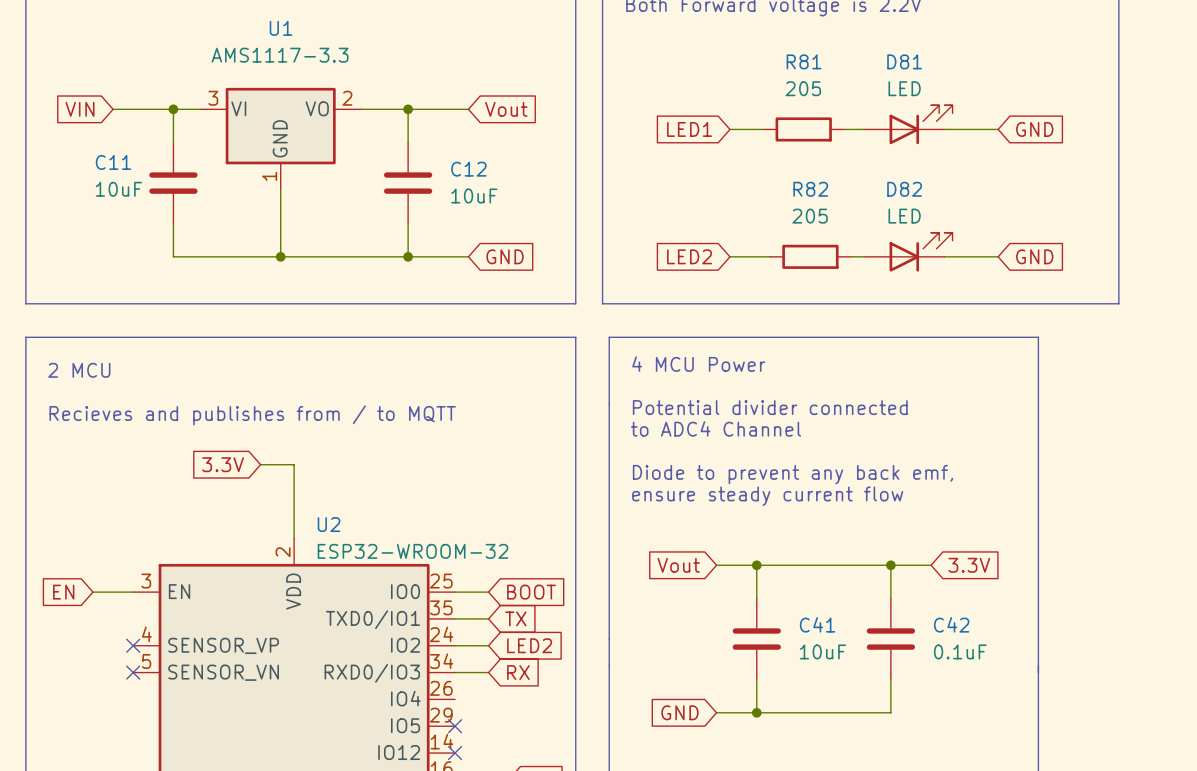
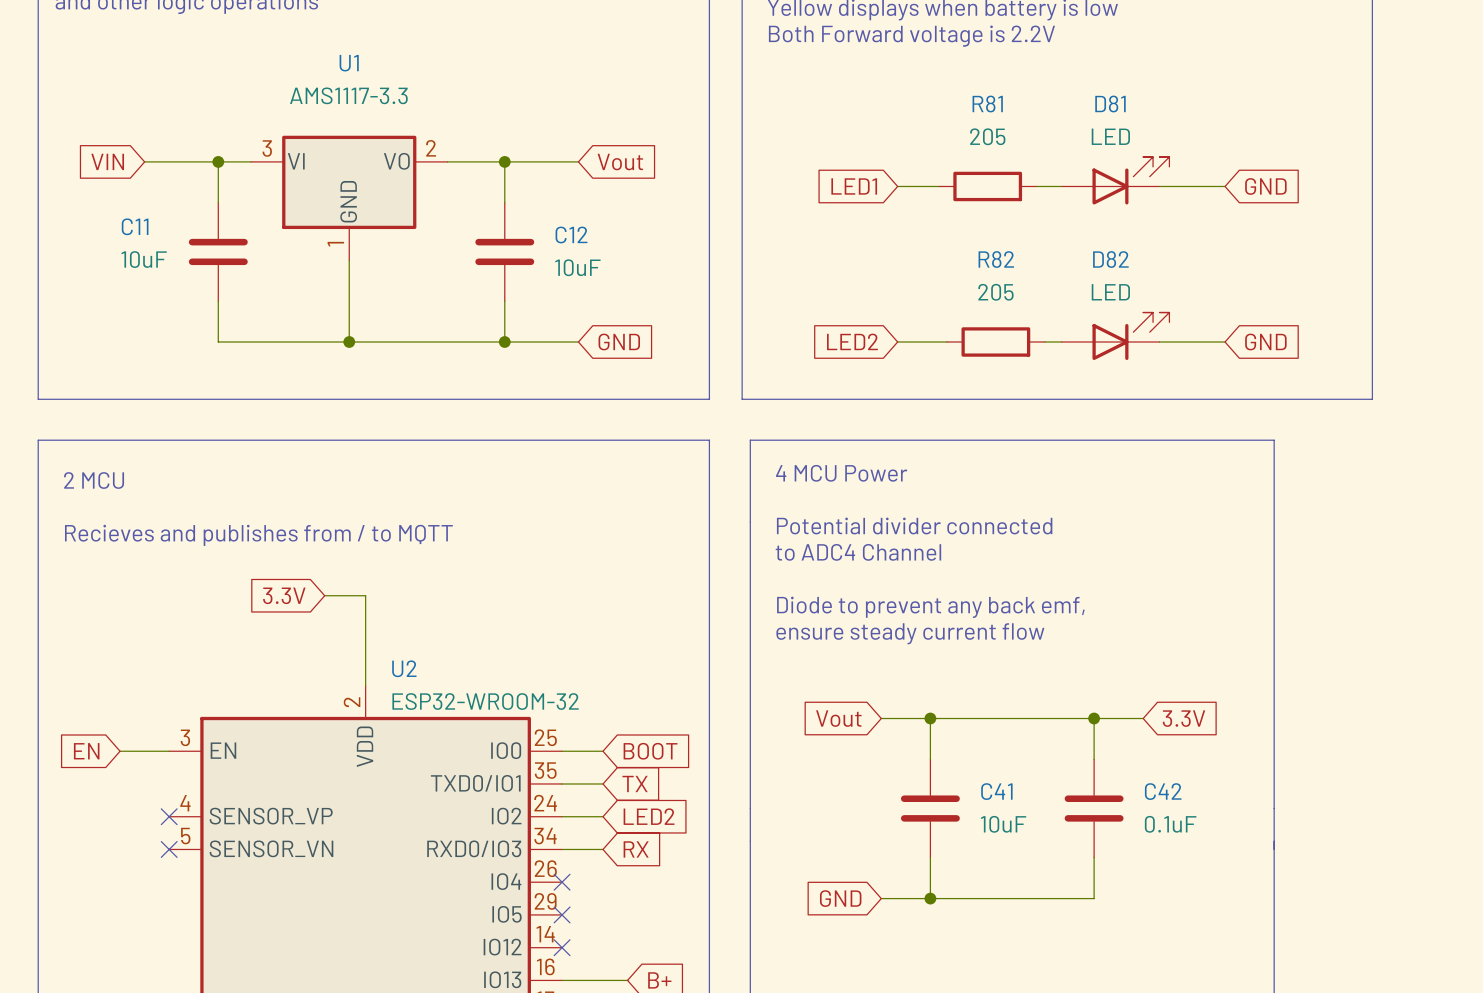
no-connect mark: none -> (562, 882)

